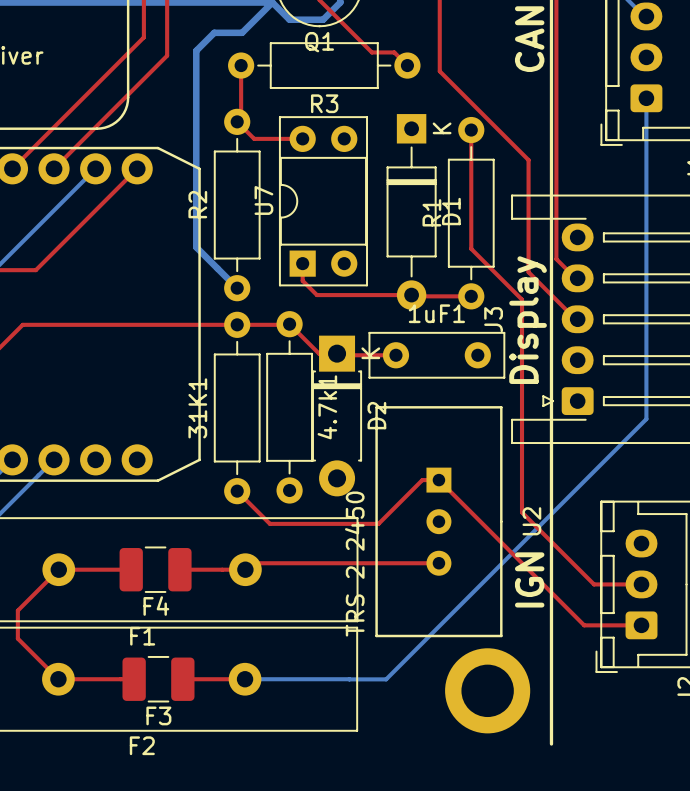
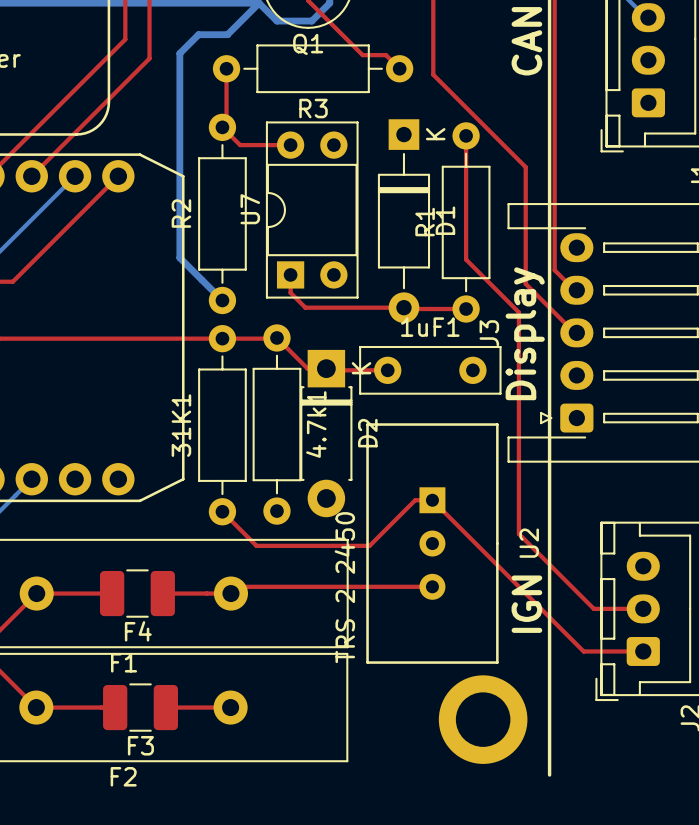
bottom track: (646, 98) (646, 419) (386, 679) (349, 679) -> none
bottom track: (245, 679) (349, 679) -> none

